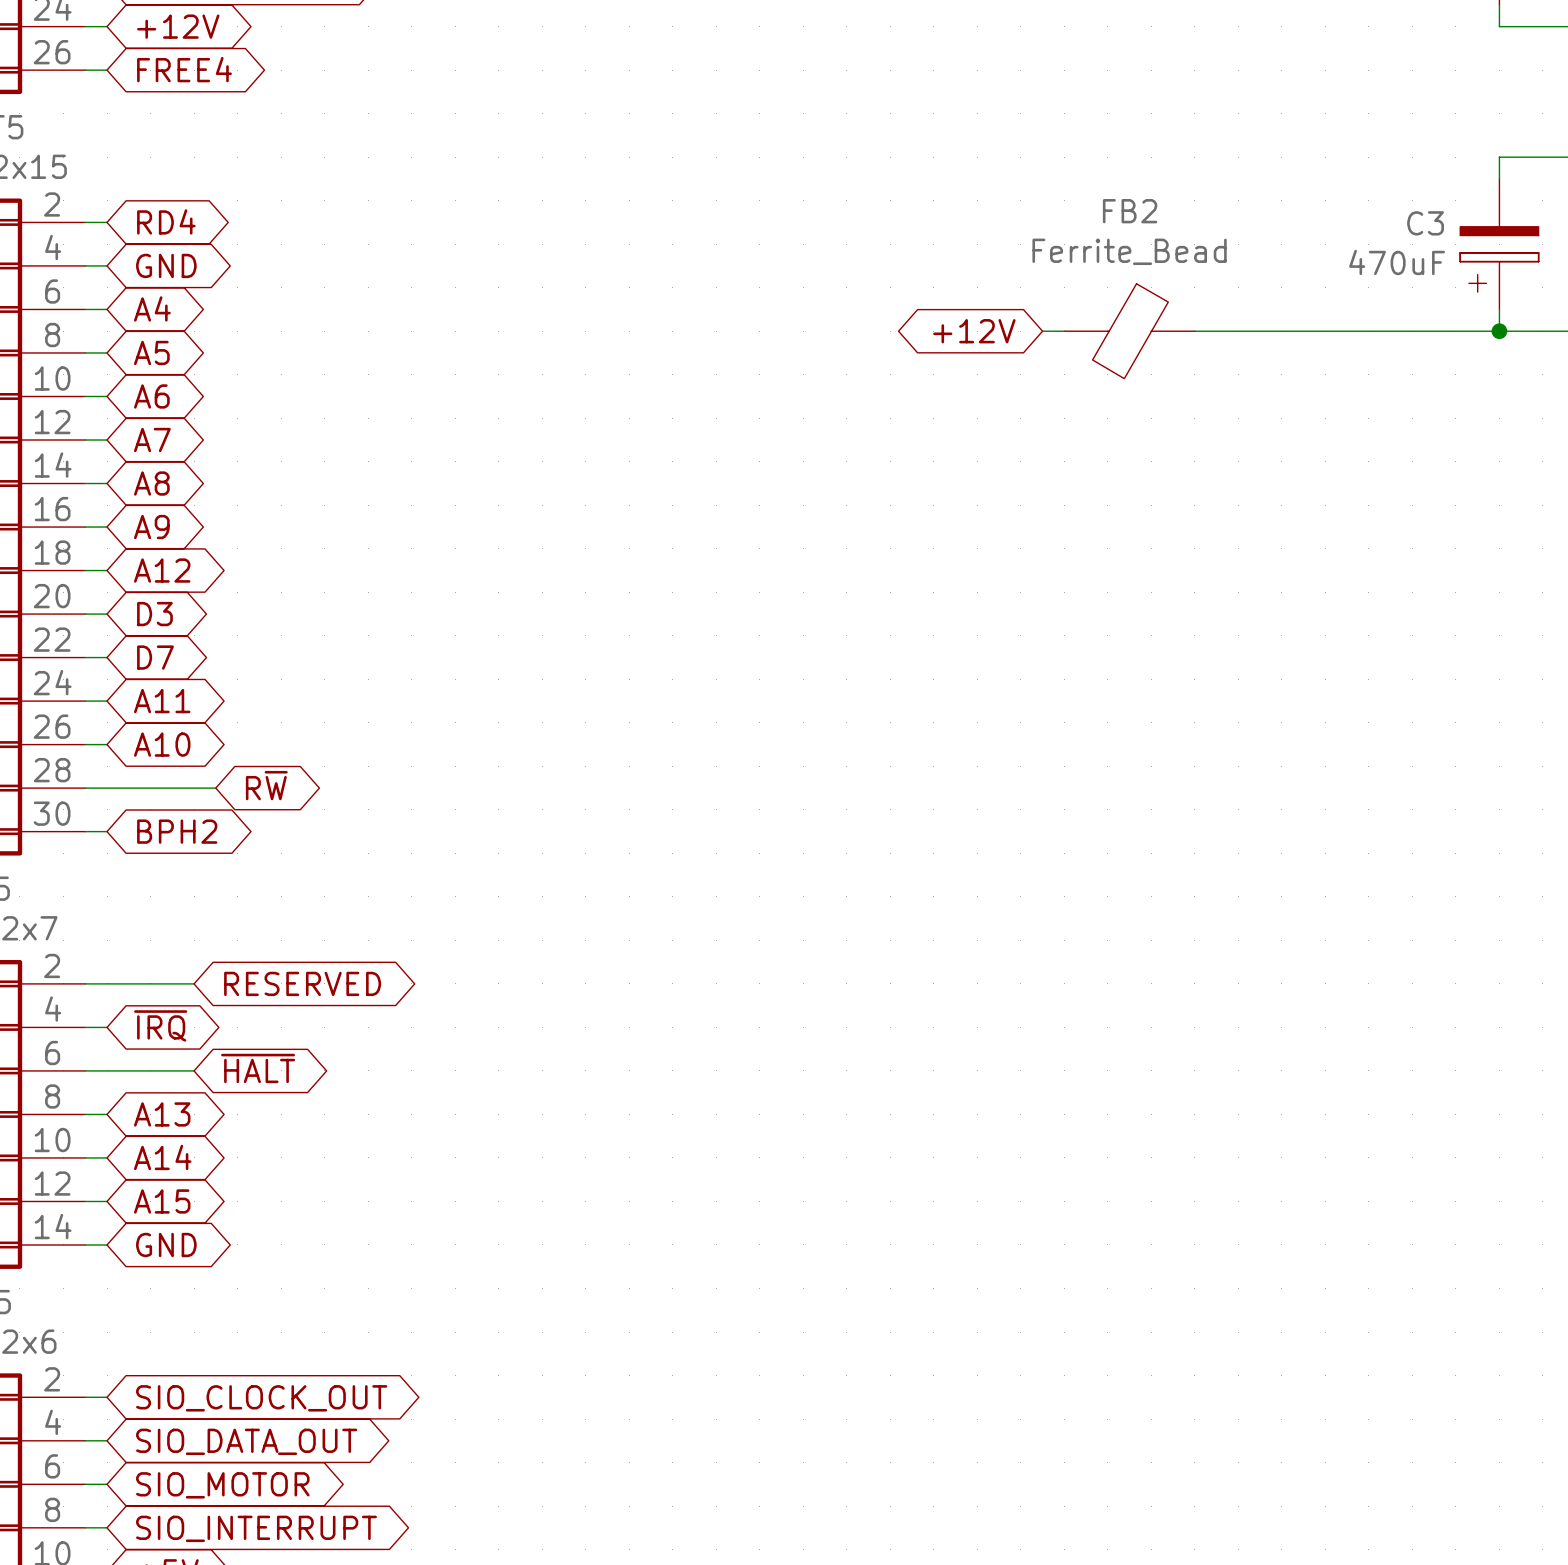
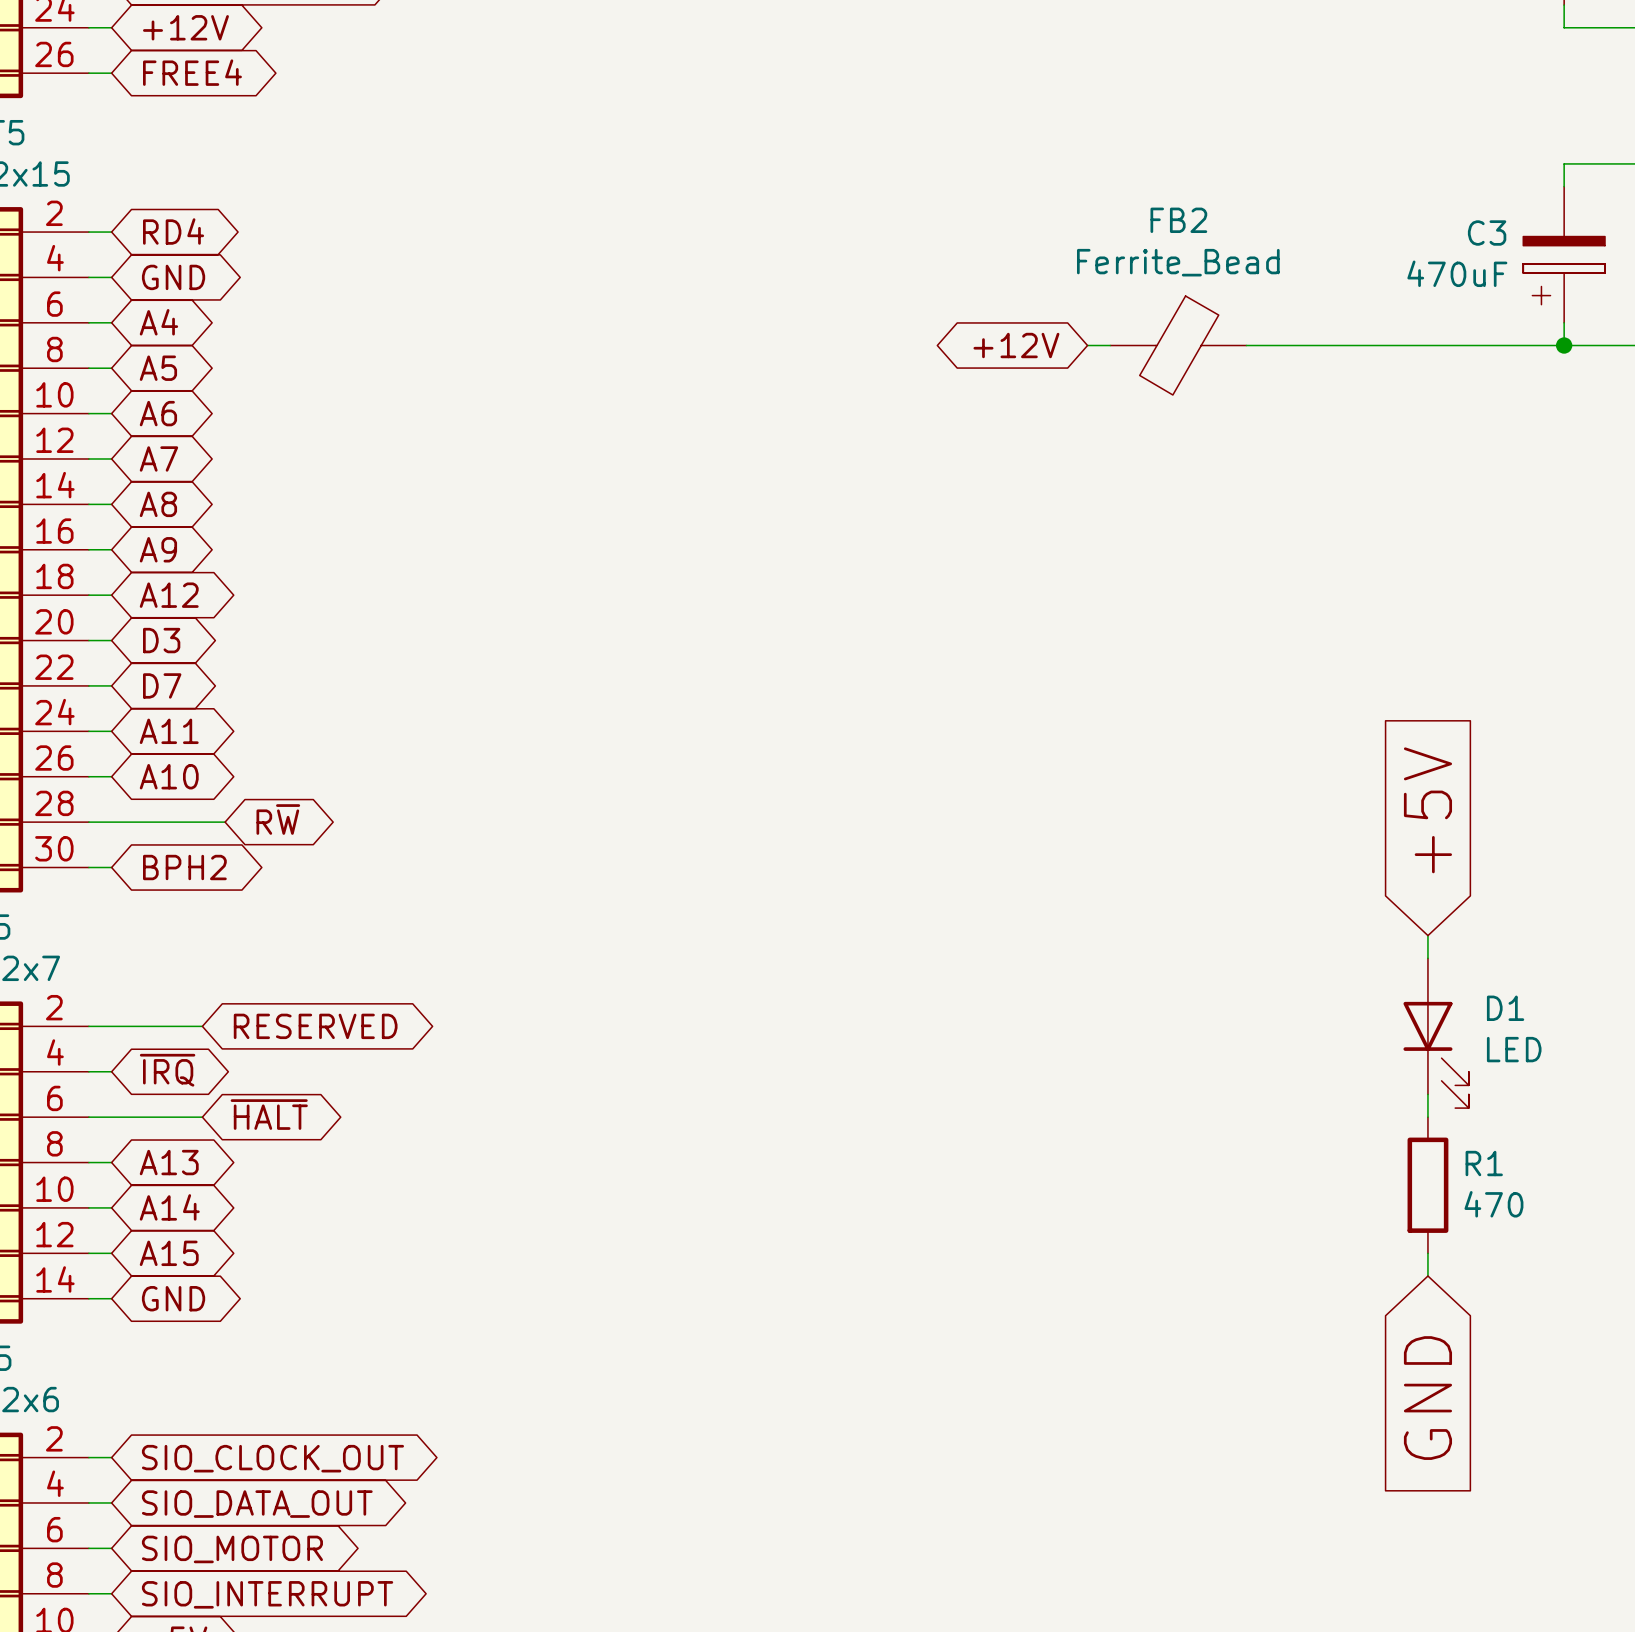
global label: none -> +5V (1427, 810)
wire: none -> (1427, 935) (1427, 958)
D1: none -> LED (1436, 1033)
wire: none -> (1427, 1094) (1427, 1117)
R1: none -> 470 (1427, 1185)
wire: none -> (1427, 1253) (1427, 1276)
global label: none -> GND (1427, 1398)

